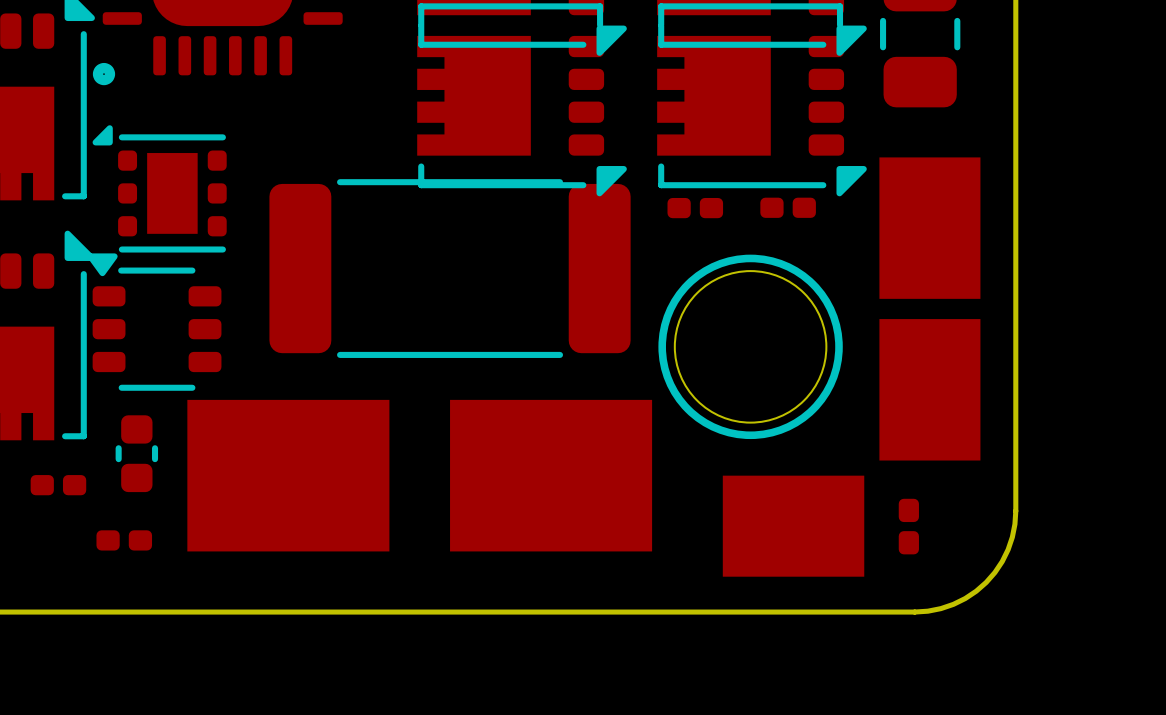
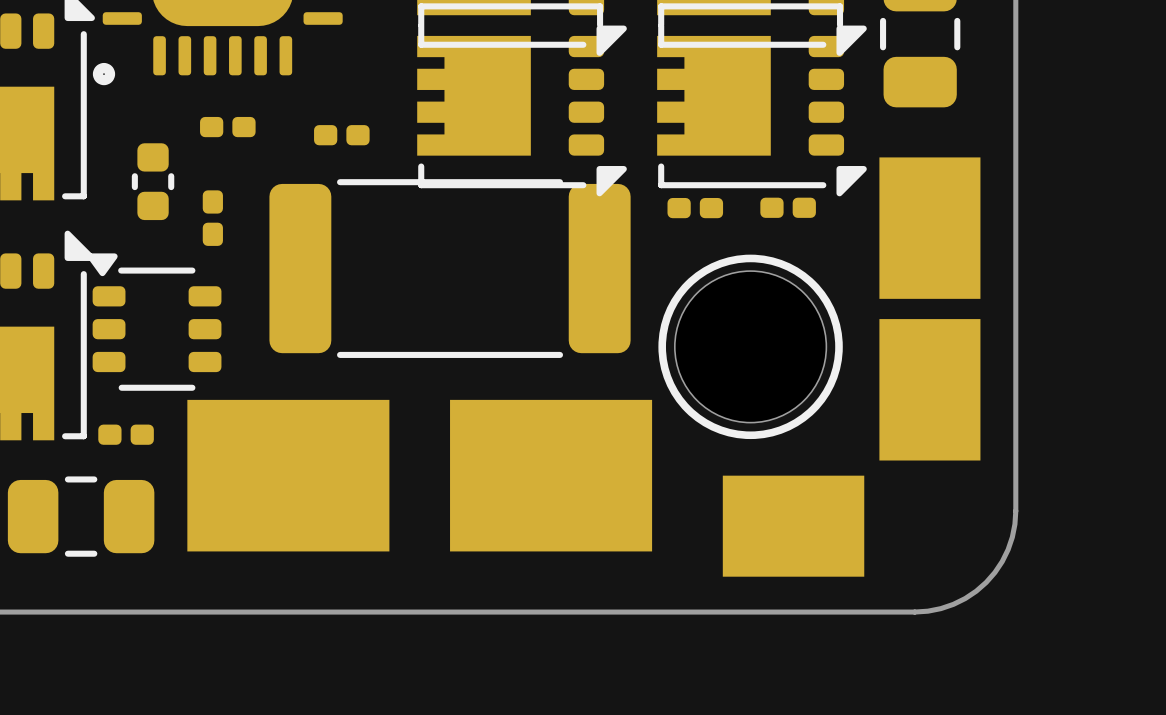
part footprint: [92, 125, 227, 253] -> [131, 143, 175, 221]
part: none -> (227, 127)
part: none -> (341, 135)
part: none -> (212, 218)
part footprint: [115, 415, 159, 493] -> [98, 424, 154, 445]
part: (58, 485) -> none
part: none -> (81, 516)
part: (908, 526) -> none
part: (124, 540) -> none

